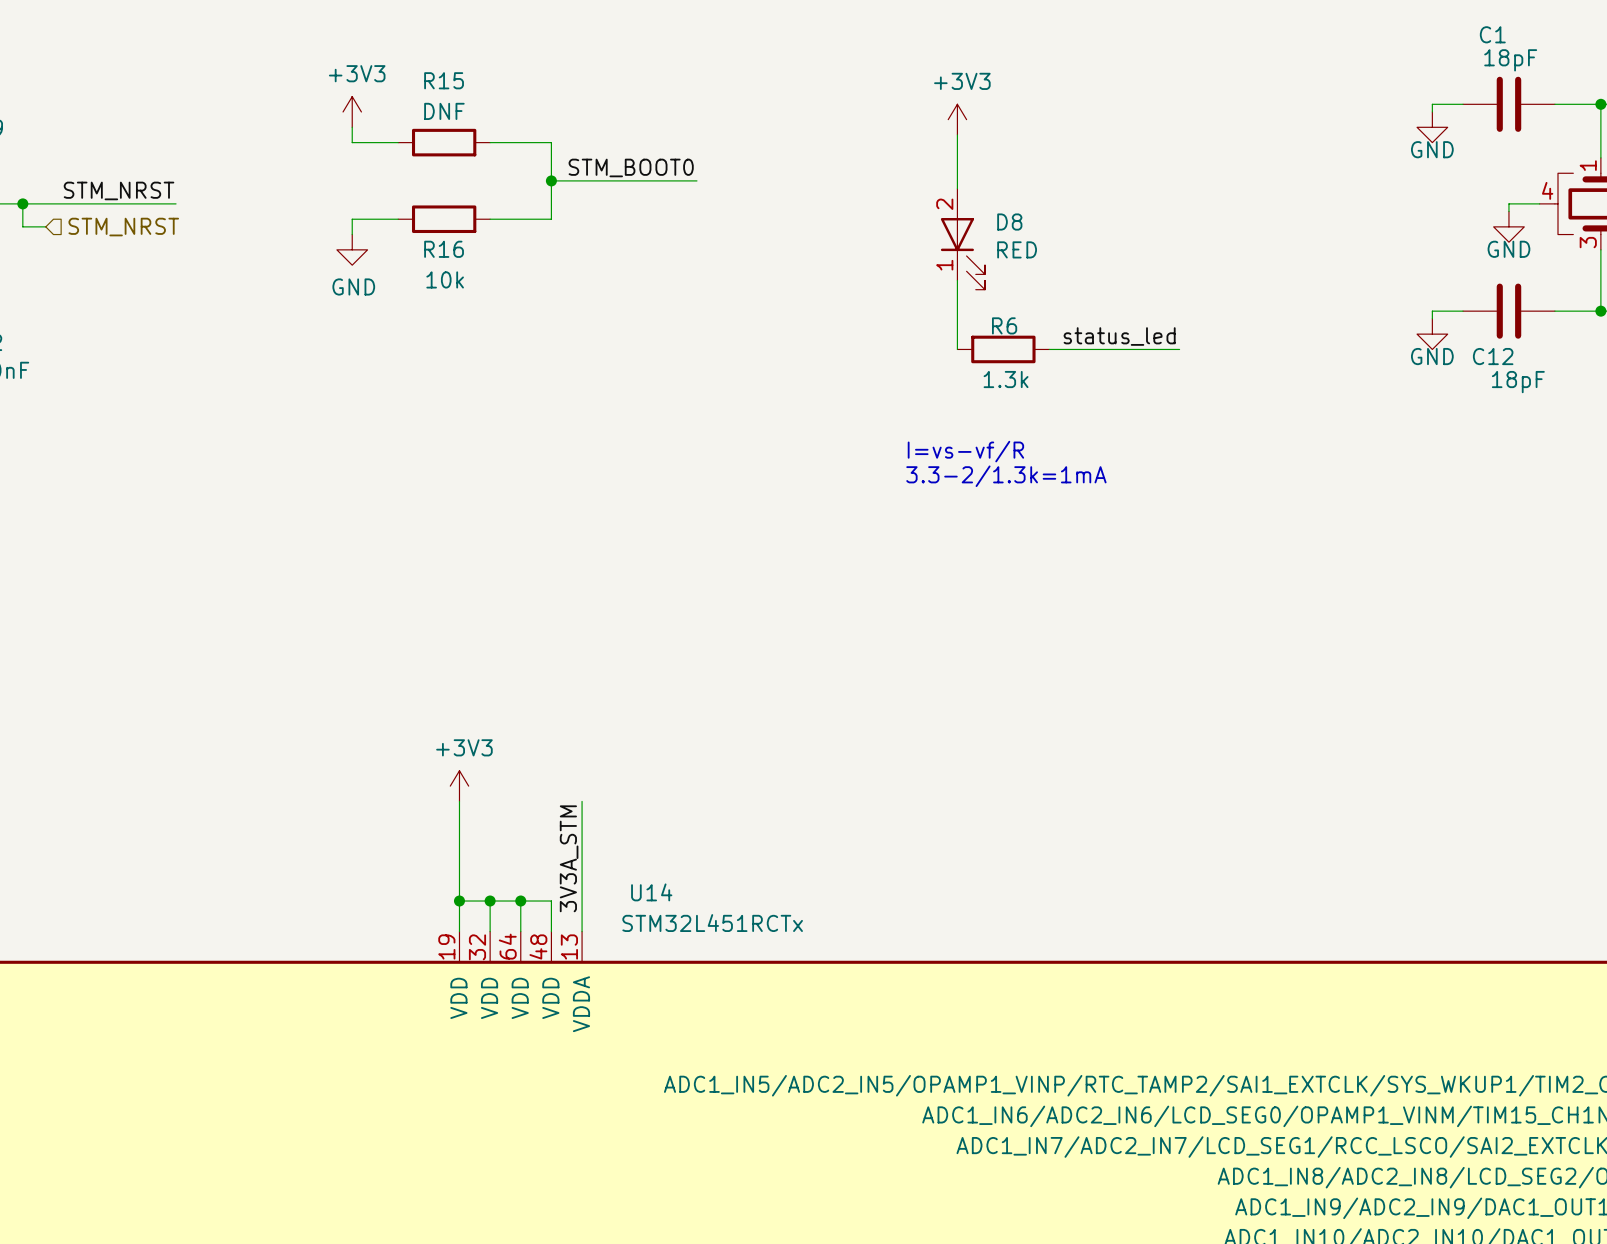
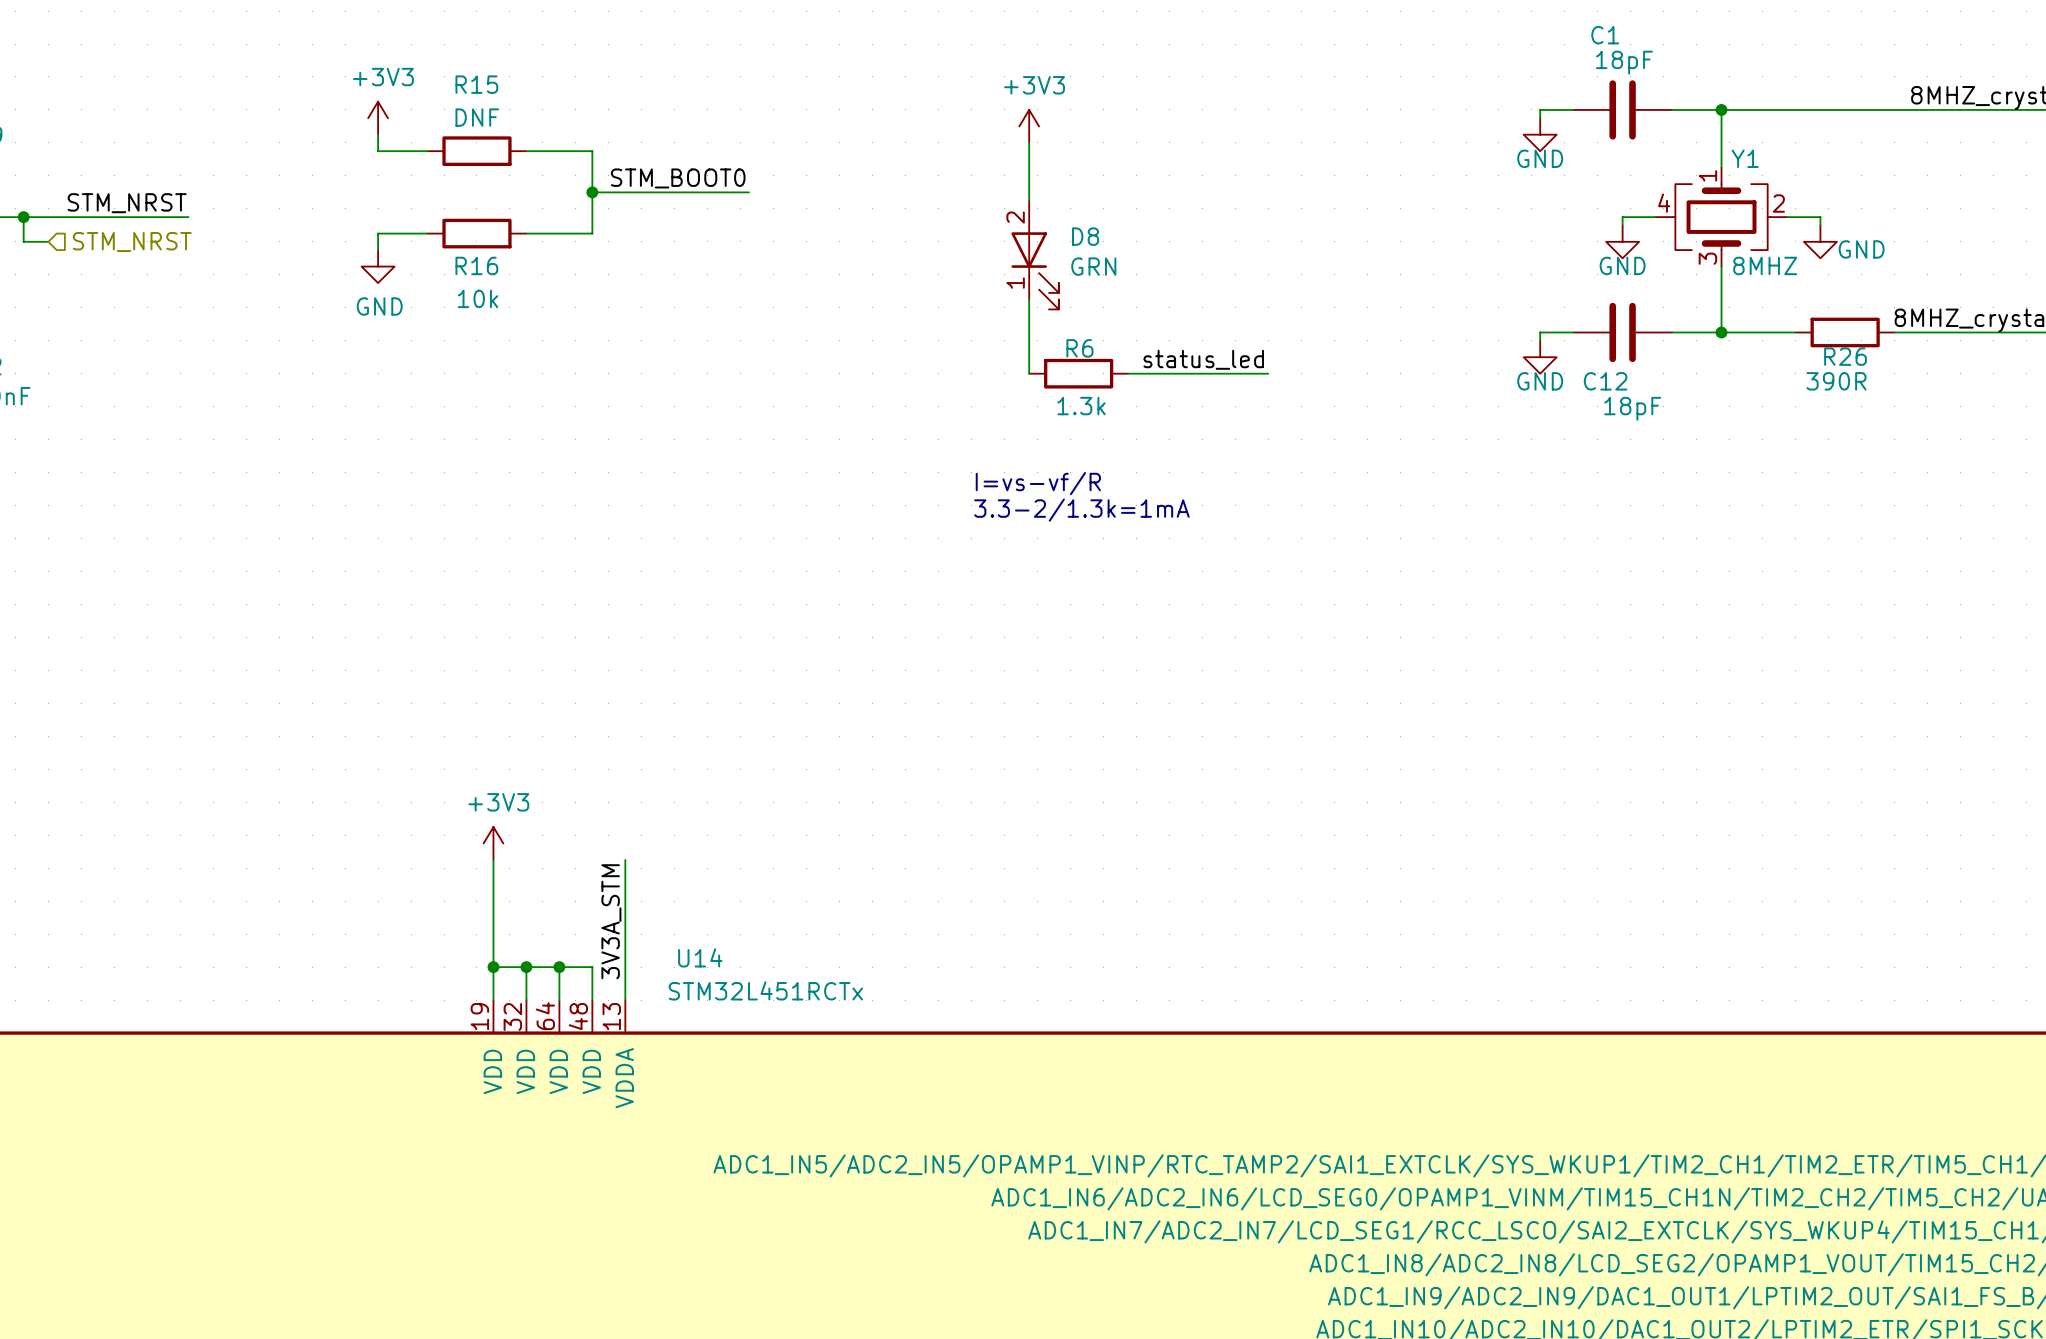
D8 value: RED (1017, 249) -> GRN (1093, 266)

